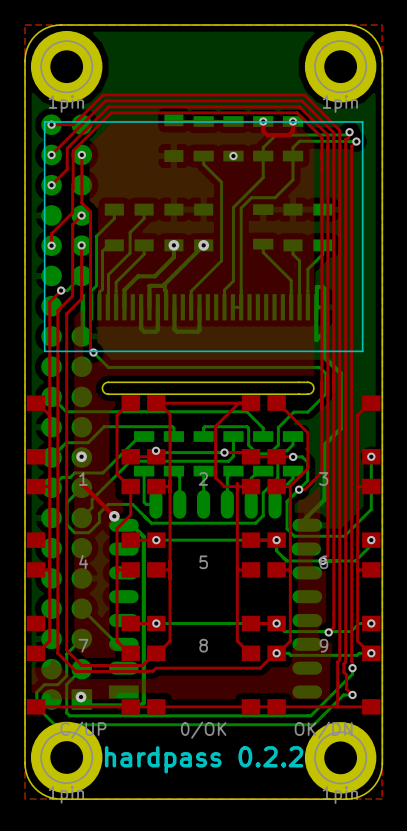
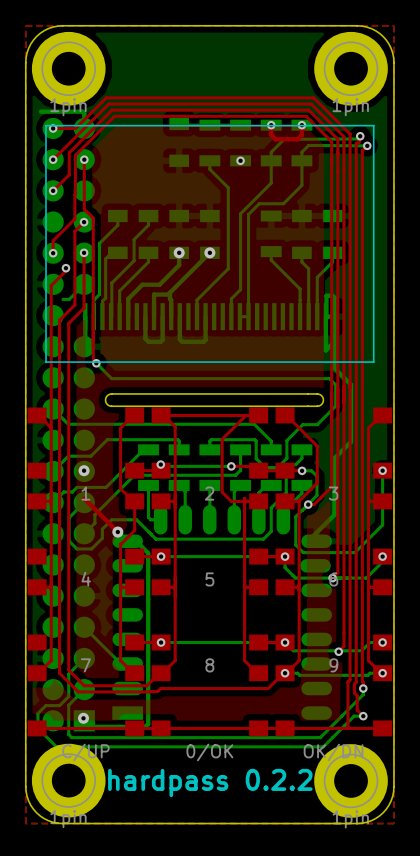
bottom track: none -> (41, 111) (82, 111) (84, 113) (84, 128)
top track: (61, 290) (49, 301) -> (65, 268) (65, 270) (51, 285) (51, 311)
via position: (61, 290) -> (65, 268)

